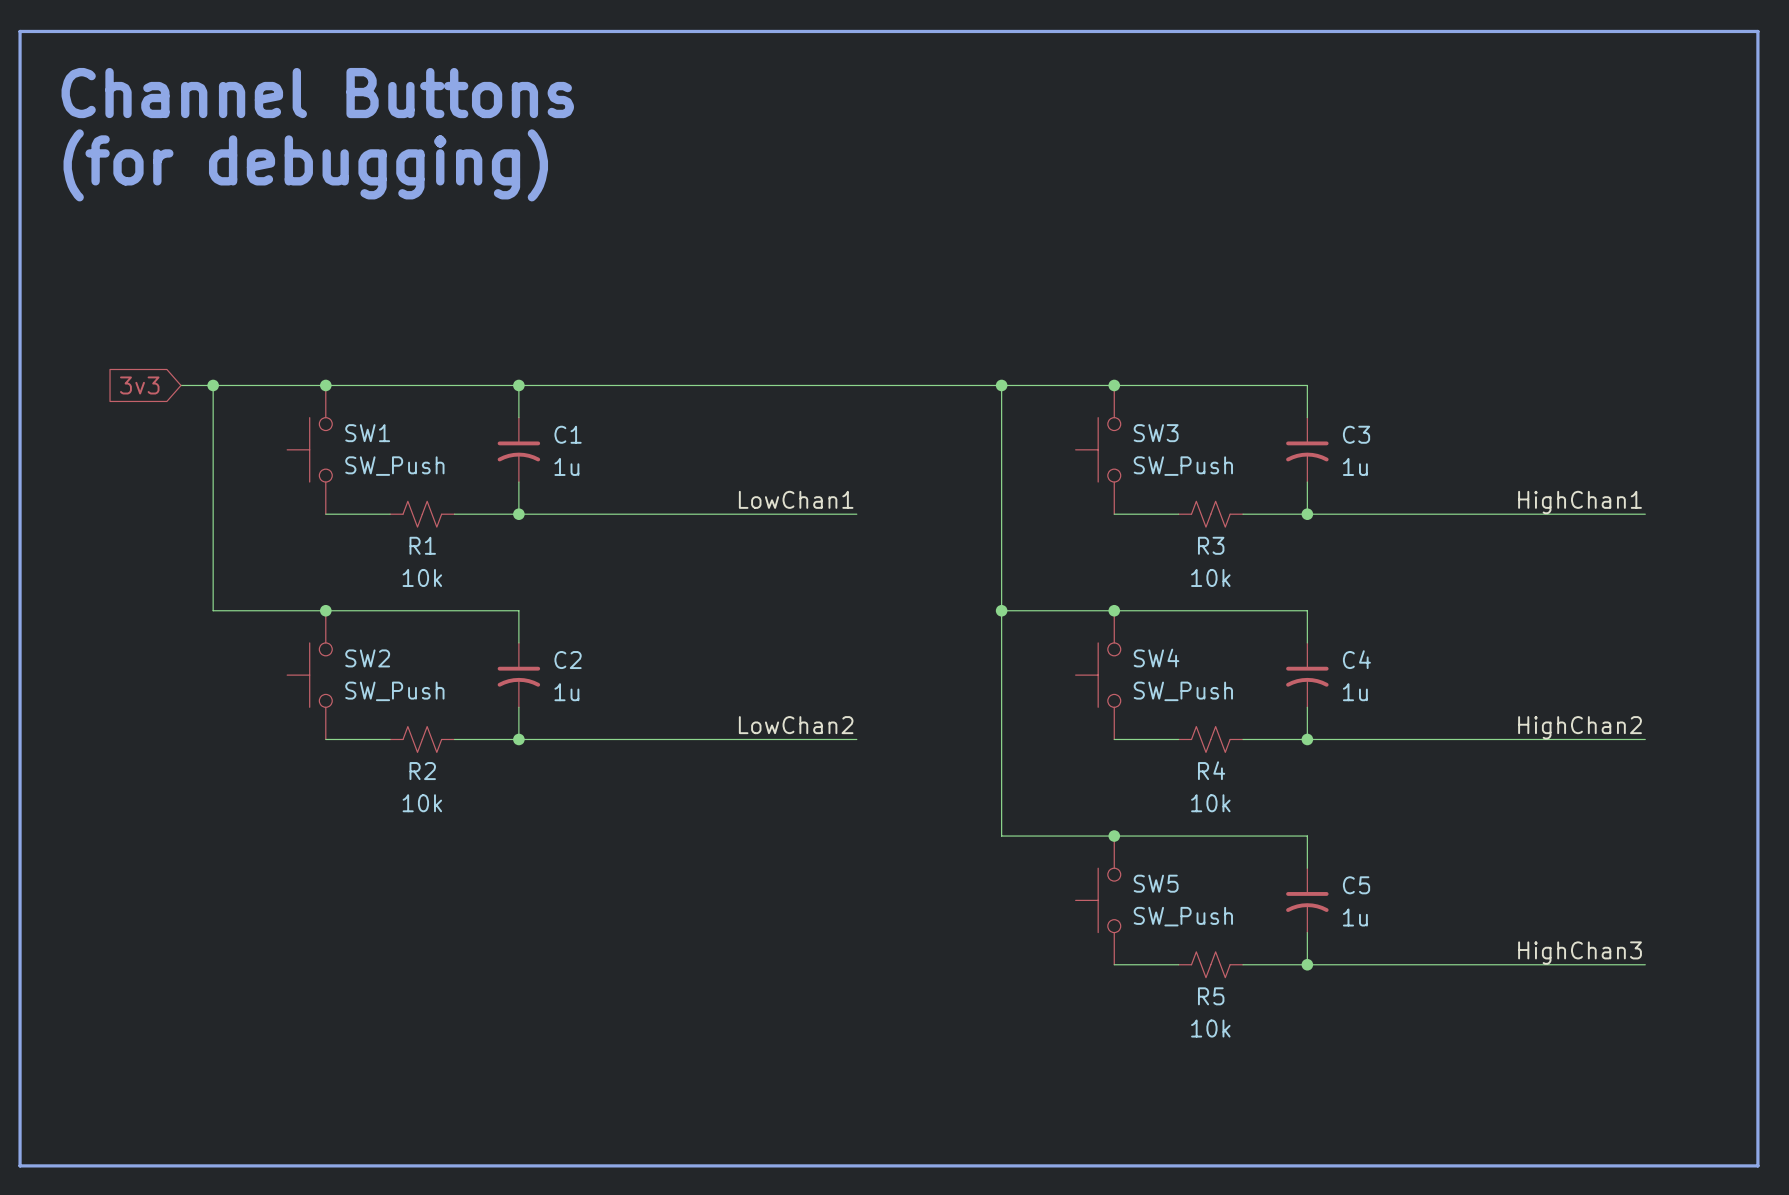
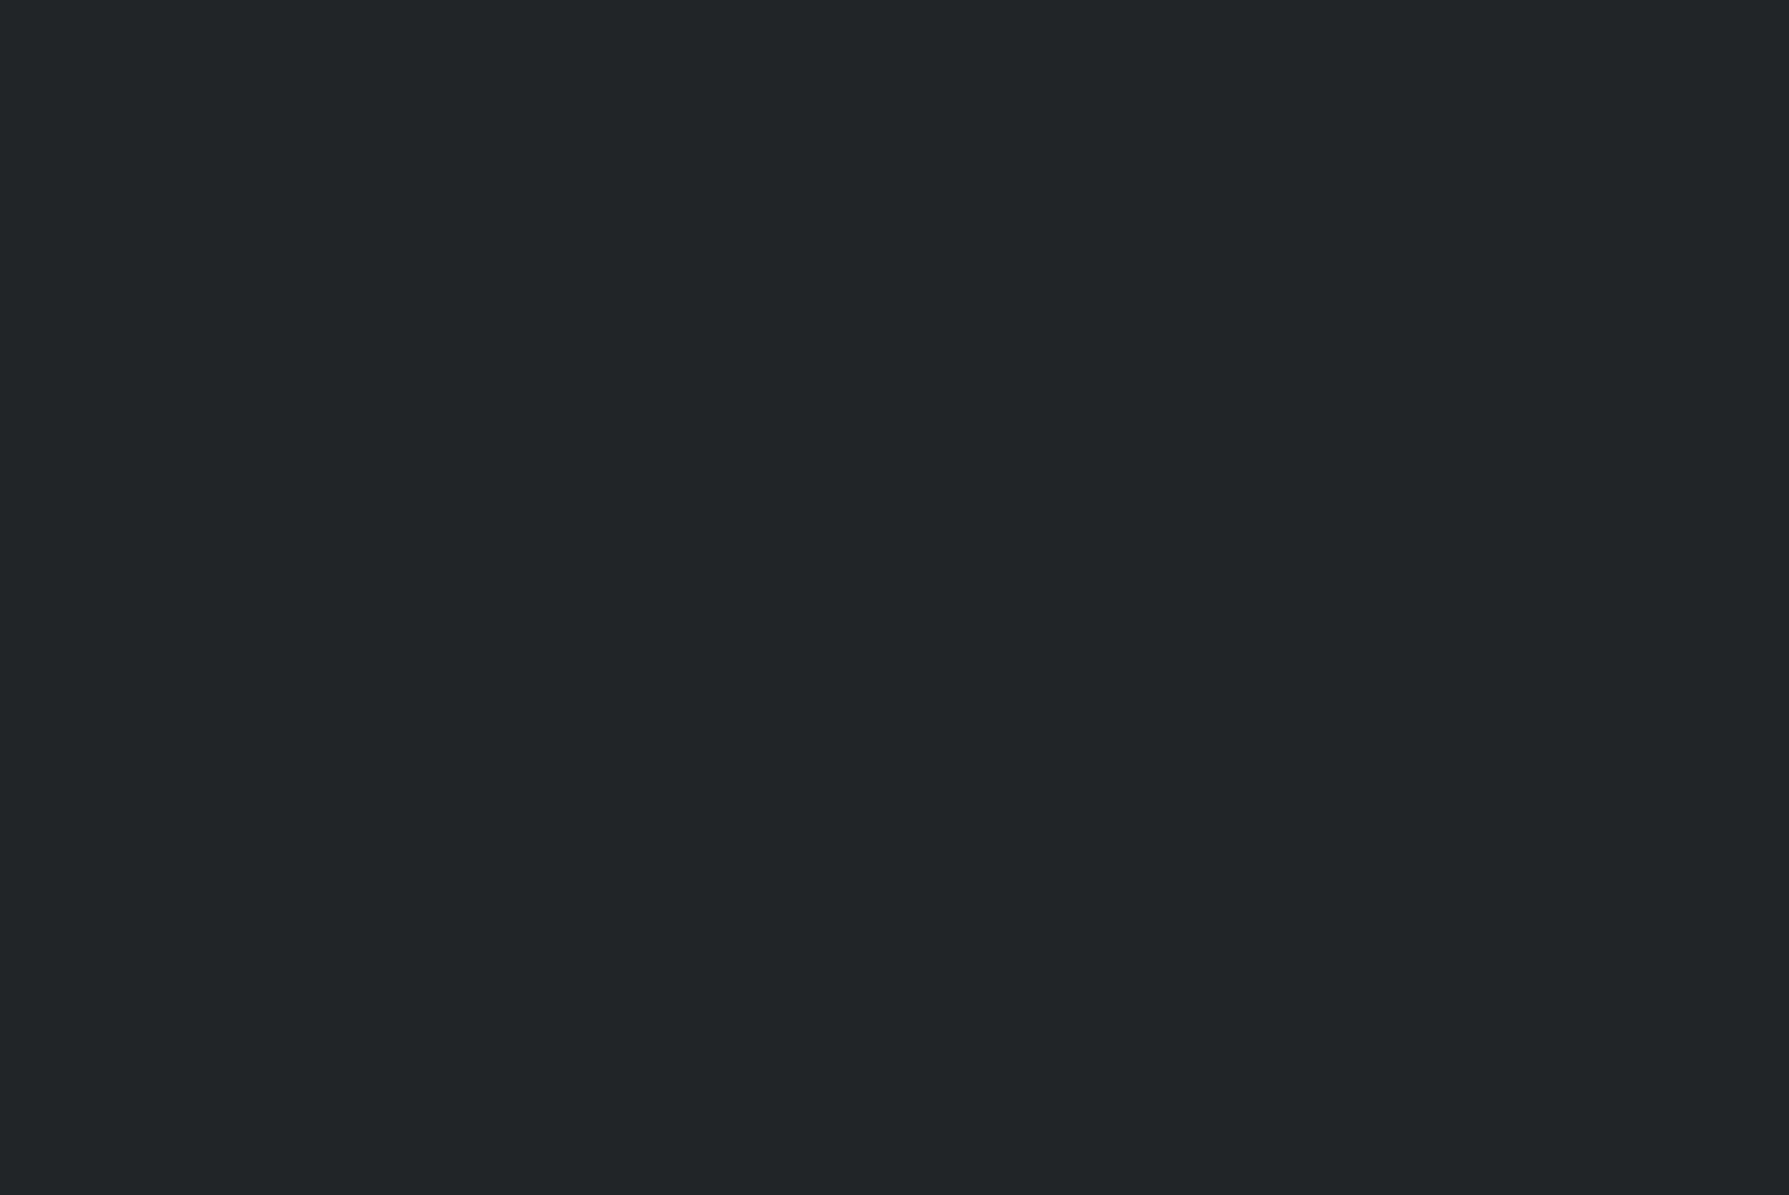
line: (20, 31) (20, 1165) (1757, 1165) (1757, 31) (20, 31) -> none
text: Channel Buttons (317, 93) -> none
text: (for debugging) (305, 165) -> none
global label: 3v3 (139, 385) -> none
wire: (180, 385) (1307, 385) (1307, 417) -> none
wire: (213, 385) (213, 610) (518, 610) (518, 642) -> none
junction: (213, 385) -> none
junction: (325, 385) -> none
wire: (518, 385) (518, 417) -> none
junction: (518, 385) -> none
wire: (1001, 385) (1001, 836) (1307, 836) (1307, 868) -> none
junction: (1001, 385) -> none
junction: (1114, 385) -> none
SW1: SW_Push (309, 449) -> none
C1: 1u (518, 449) -> none
SW3: SW_Push (1098, 449) -> none
C3: 1u (1307, 449) -> none
wire: (518, 482) (518, 514) -> none
wire: (1307, 482) (1307, 514) -> none
label: LowChan1 (796, 499) -> none
label: HighChan1 (1580, 502) -> none
wire: (325, 514) (390, 514) -> none
R1: 10k (422, 514) -> none
wire: (454, 514) (856, 514) -> none
junction: (518, 514) -> none
wire: (1114, 514) (1178, 514) -> none
R3: 10k (1210, 514) -> none
wire: (1242, 514) (1645, 514) -> none
junction: (1307, 514) -> none
junction: (325, 610) -> none
wire: (1001, 610) (1307, 610) (1307, 642) -> none
junction: (1001, 610) -> none
junction: (1114, 610) -> none
SW2: SW_Push (309, 675) -> none
C2: 1u (518, 675) -> none
SW4: SW_Push (1098, 675) -> none
C4: 1u (1307, 675) -> none
wire: (518, 707) (518, 739) -> none
wire: (1307, 707) (1307, 739) -> none
label: LowChan2 (796, 725) -> none
label: HighChan2 (1580, 727) -> none
wire: (325, 739) (390, 739) -> none
R2: 10k (422, 739) -> none
wire: (454, 739) (856, 739) -> none
junction: (518, 739) -> none
wire: (1114, 739) (1178, 739) -> none
R4: 10k (1210, 739) -> none
wire: (1242, 739) (1645, 739) -> none
junction: (1307, 739) -> none
junction: (1114, 836) -> none
SW5: SW_Push (1098, 900) -> none
C5: 1u (1307, 900) -> none
wire: (1307, 932) (1307, 964) -> none
label: HighChan3 (1580, 953) -> none
wire: (1114, 964) (1178, 964) -> none
R5: 10k (1210, 964) -> none
wire: (1242, 964) (1645, 964) -> none
junction: (1307, 964) -> none

